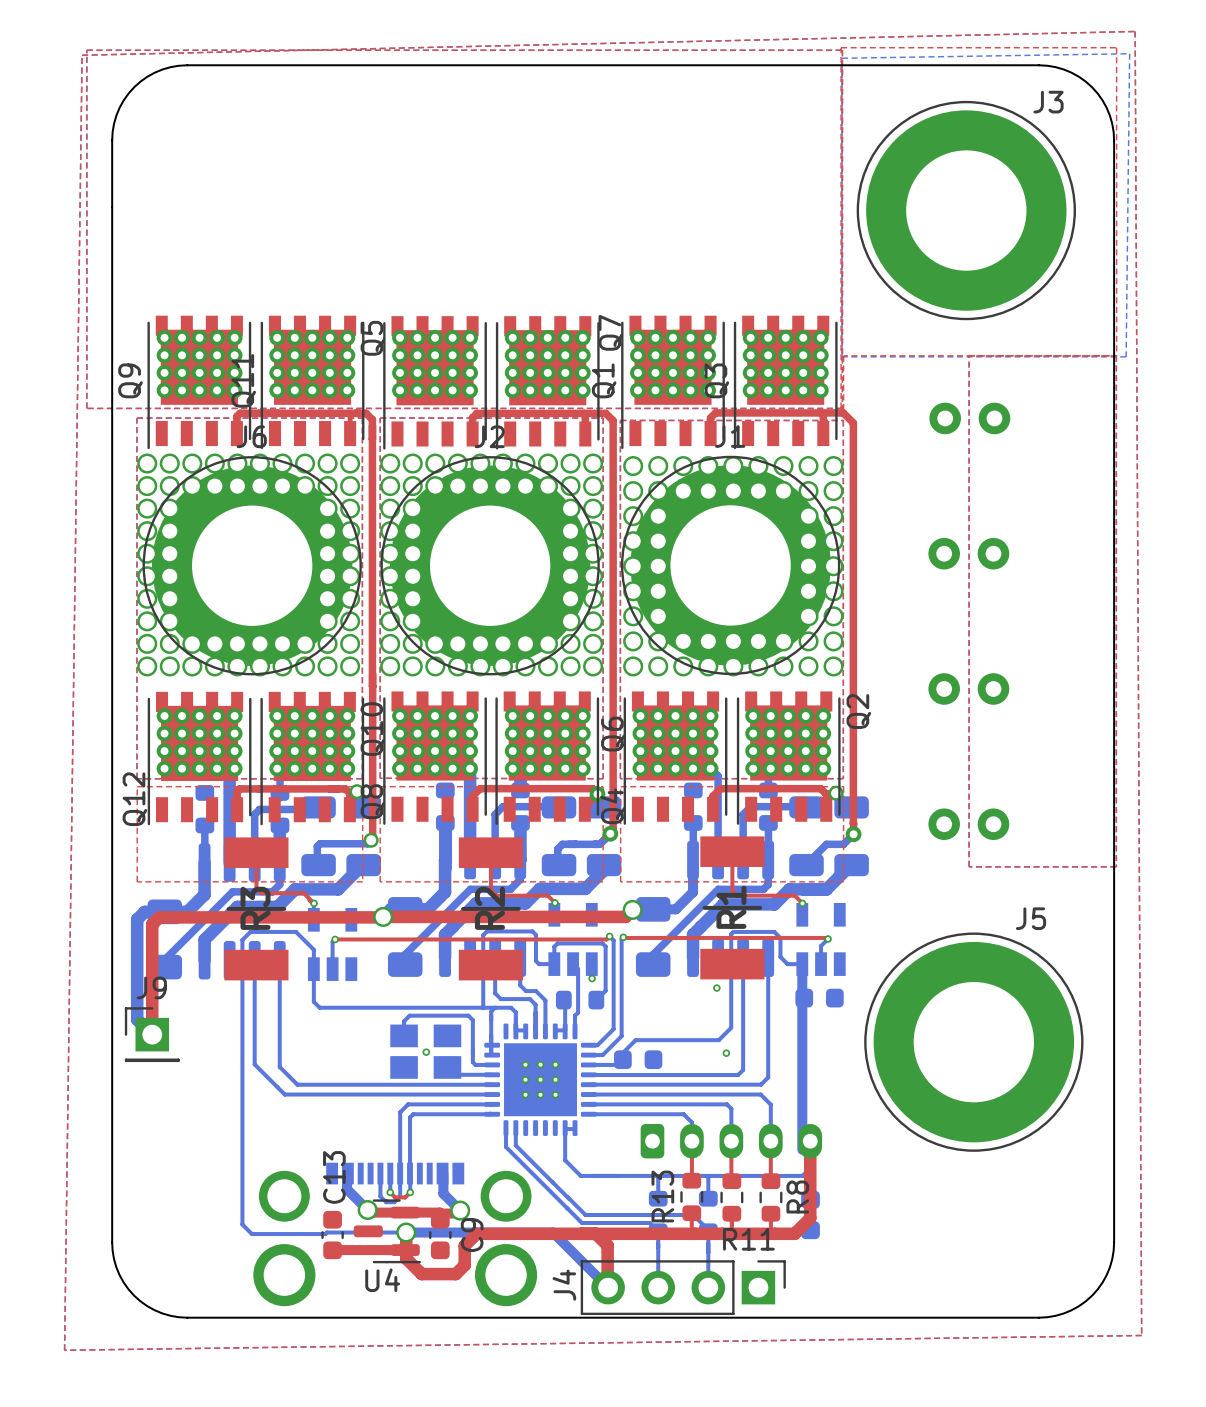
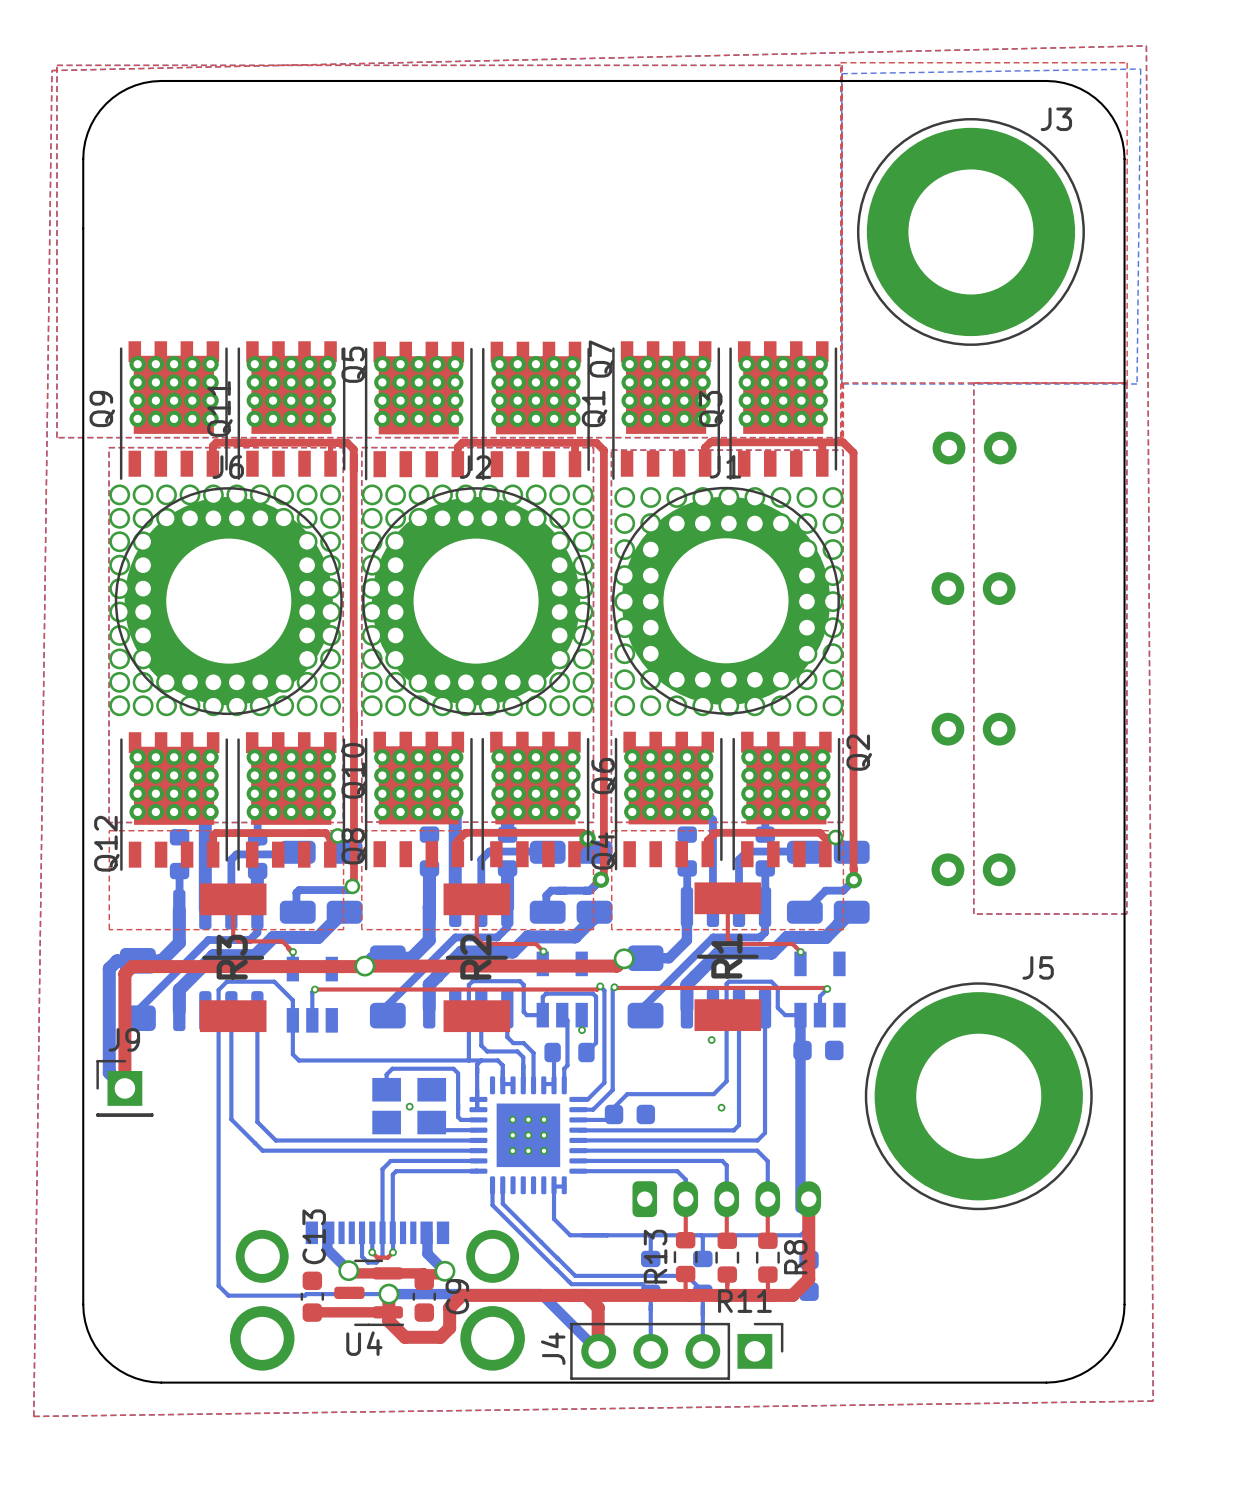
part footprint: [484, 1023, 597, 1136] -> [469, 1076, 588, 1195]

